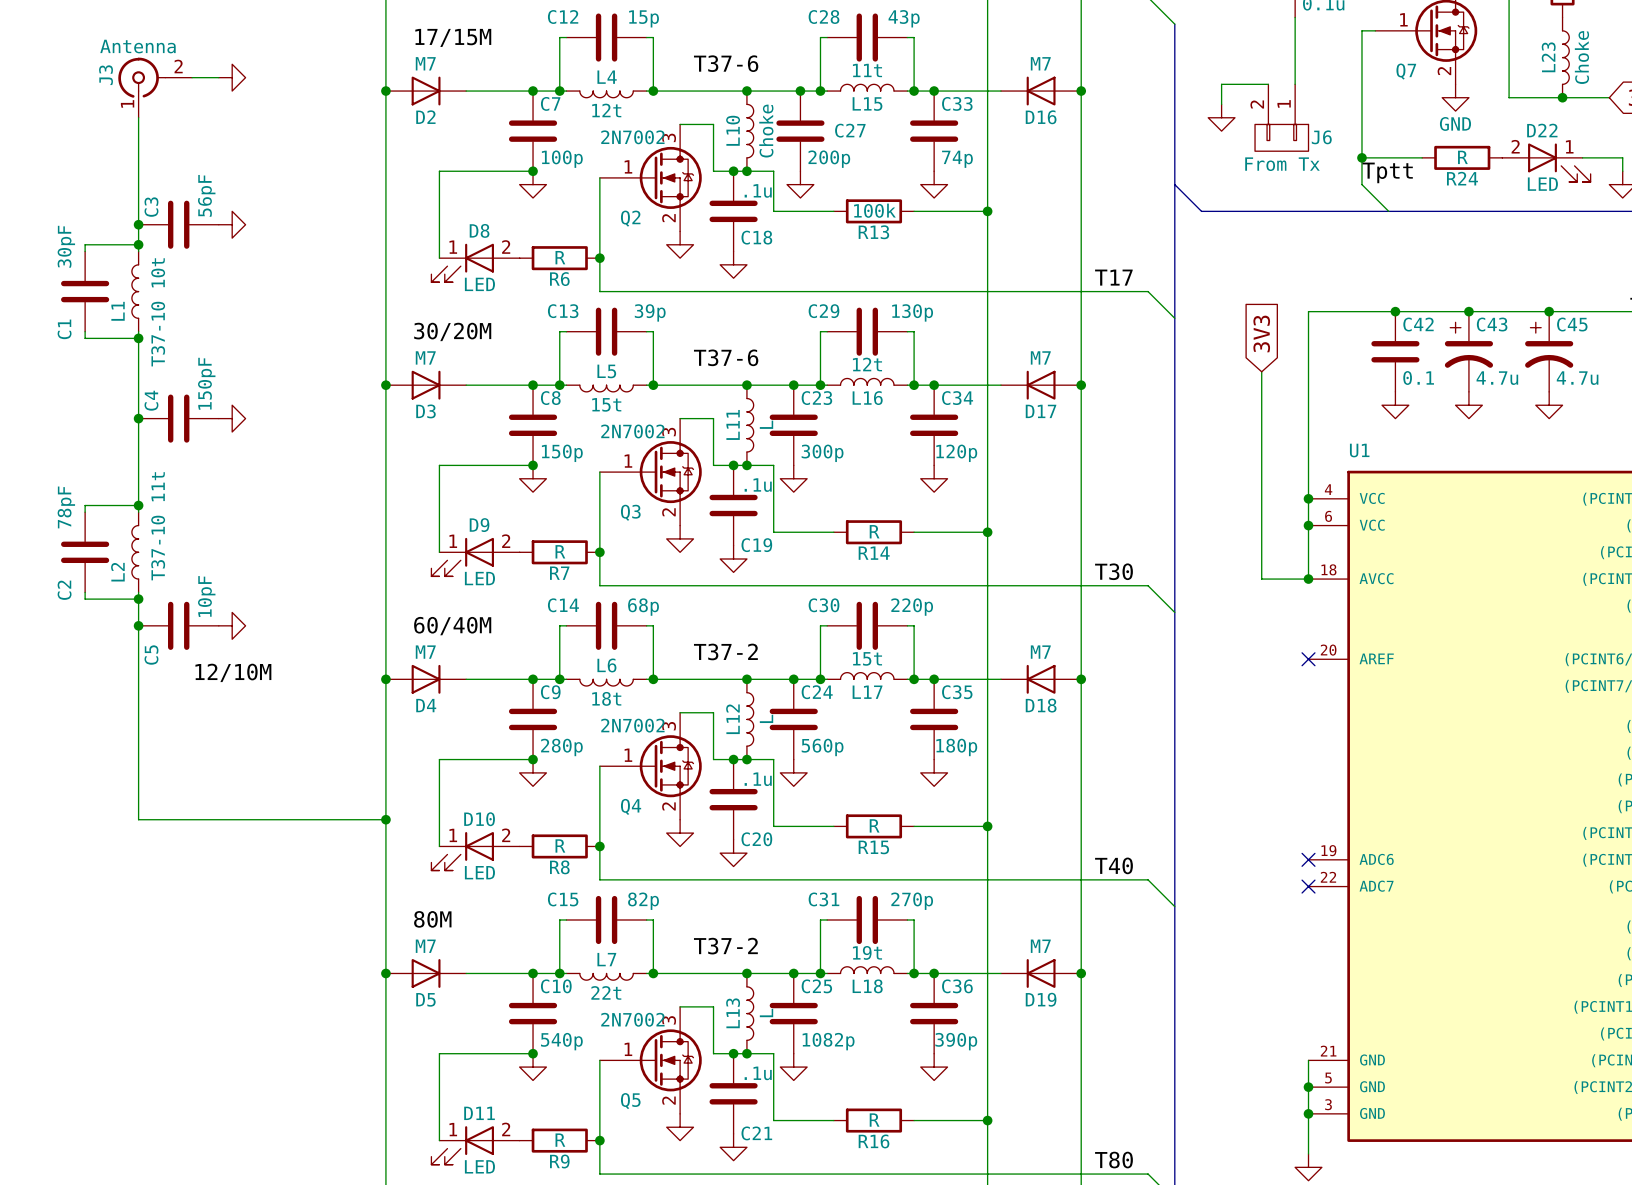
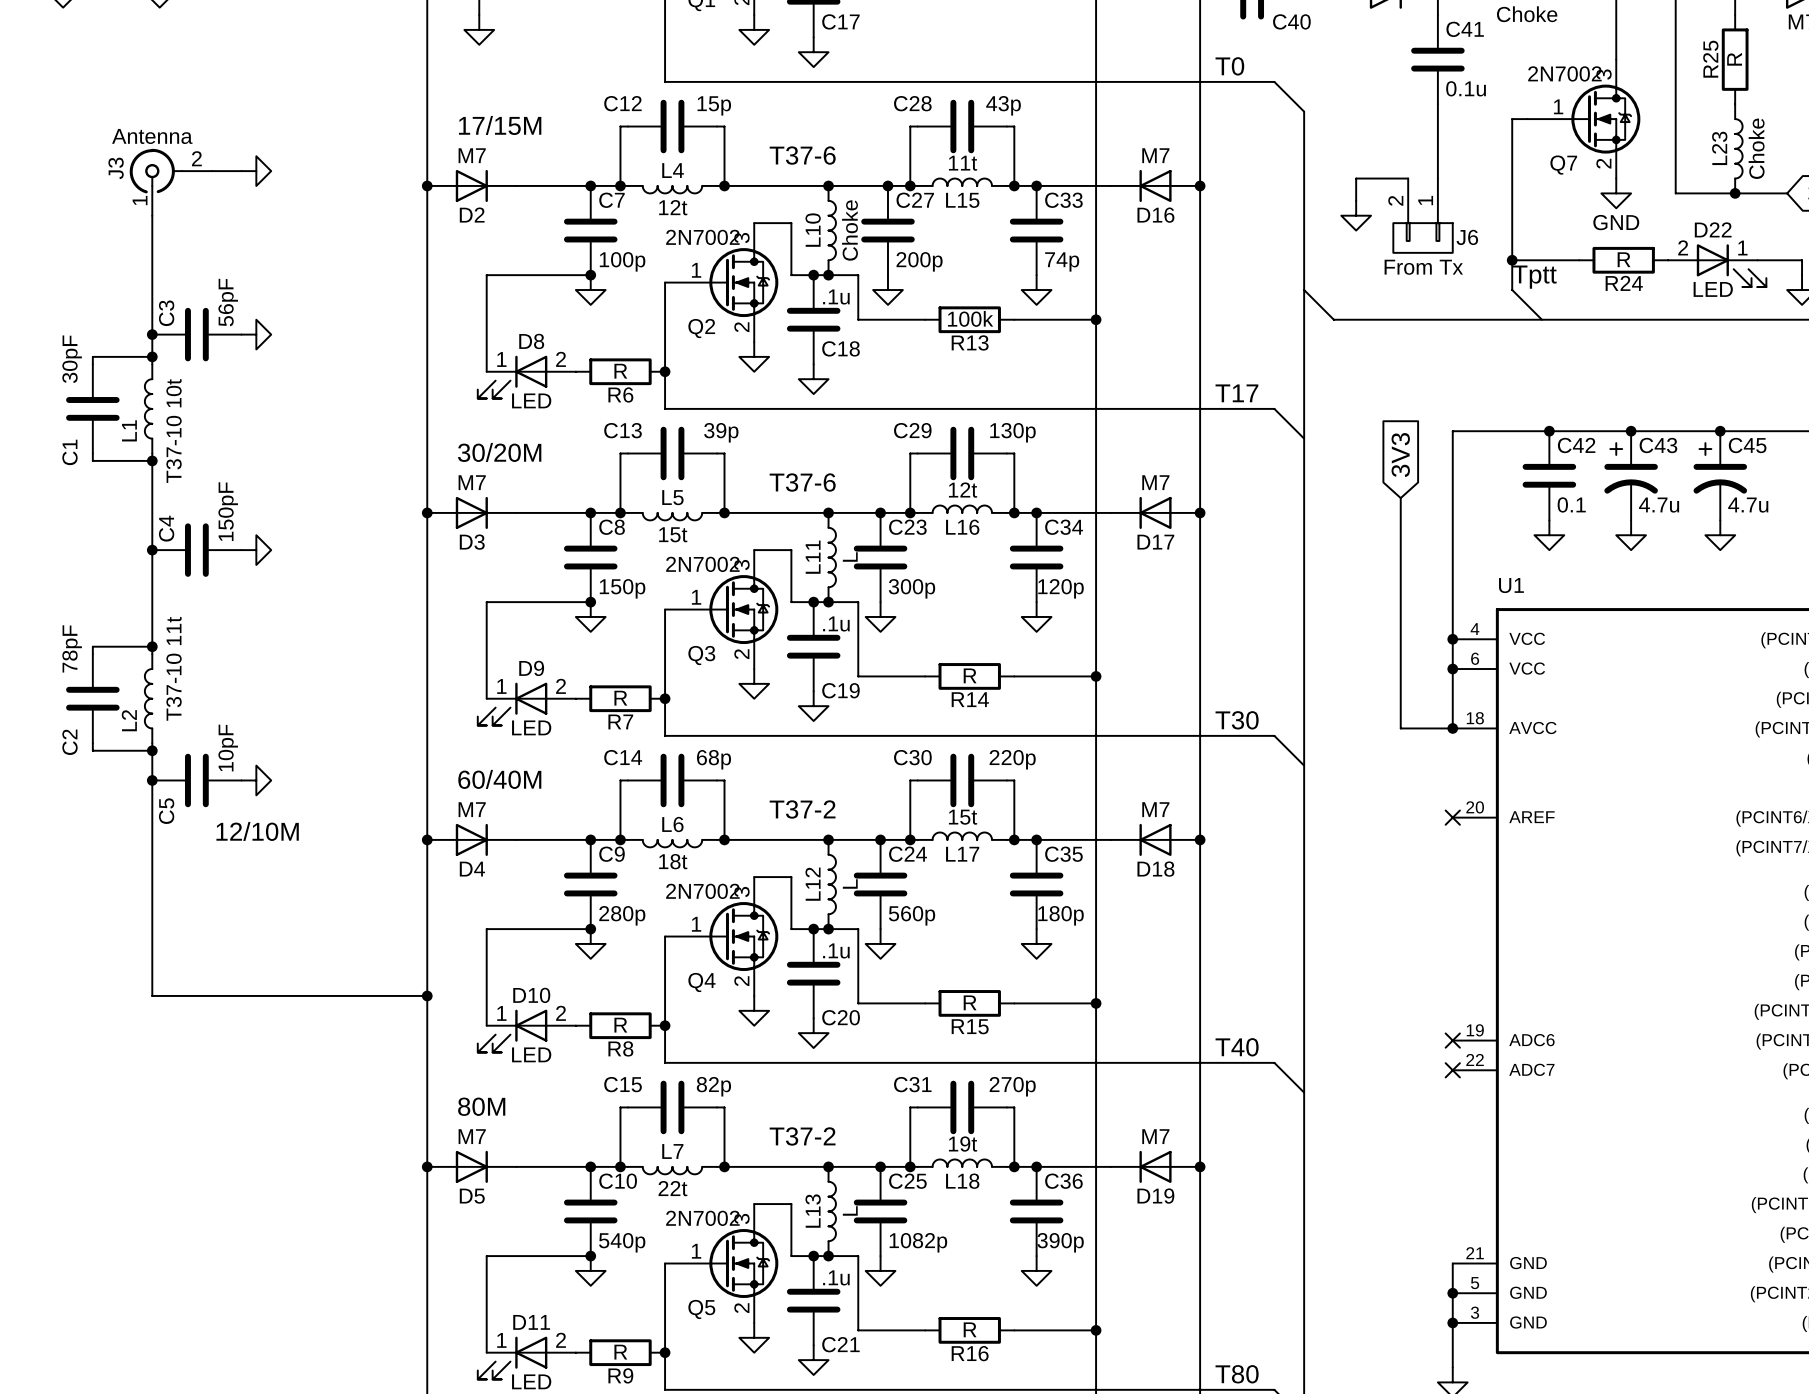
C27 name position: C27 (850, 130) -> C27 (915, 200)

